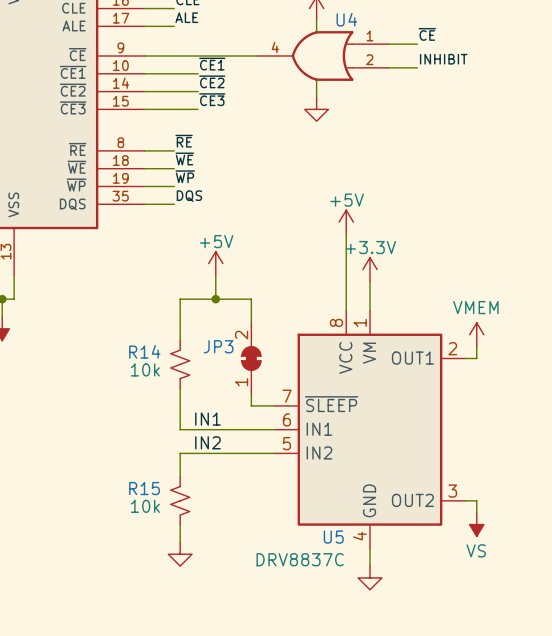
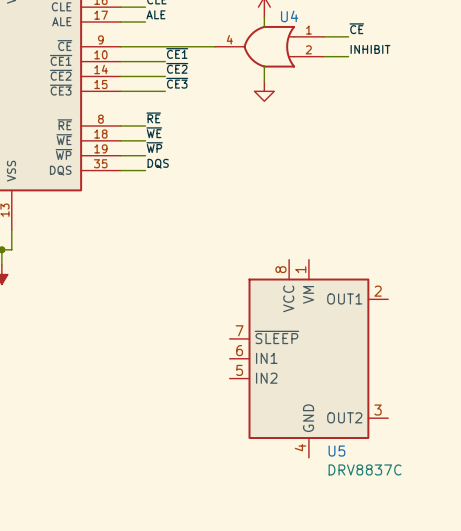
power symbol: +5V (346, 222) -> none
wire: (346, 233) (346, 311) -> none
power symbol: +5V (215, 263) -> none
power symbol: +3.3V (369, 269) -> none
wire: (215, 275) (215, 299) -> none
wire: (369, 281) (369, 311) -> none
junction: (215, 299) -> none
wire: (251, 322) (251, 299) (180, 299) (180, 340) -> none
power symbol: VMEM (476, 334) -> none
wire: (476, 346) (476, 358) (464, 358) -> none
JP3: (251, 358) -> none
R14: 10k (180, 364) -> none
wire: (180, 388) (180, 429) (275, 429) -> none
wire: (251, 394) (251, 405) (275, 405) -> none
label: IN1 (207, 419) -> none
label: IN2 (207, 442) -> none
wire: (275, 453) (180, 453) (180, 477) -> none
R15: 10k (180, 500) -> none
wire: (464, 500) (476, 500) (476, 512) -> none
wire: (180, 524) (180, 542) -> none
power symbol: VS (476, 524) -> none
U5 name position: U5 (333, 537) -> U5 (336, 451)
wire: (369, 548) (369, 566) -> none
power symbol: (180, 554) -> none
U5 value position: DRV8837C (300, 559) -> DRV8837C (365, 469)
power symbol: (369, 577) -> none

